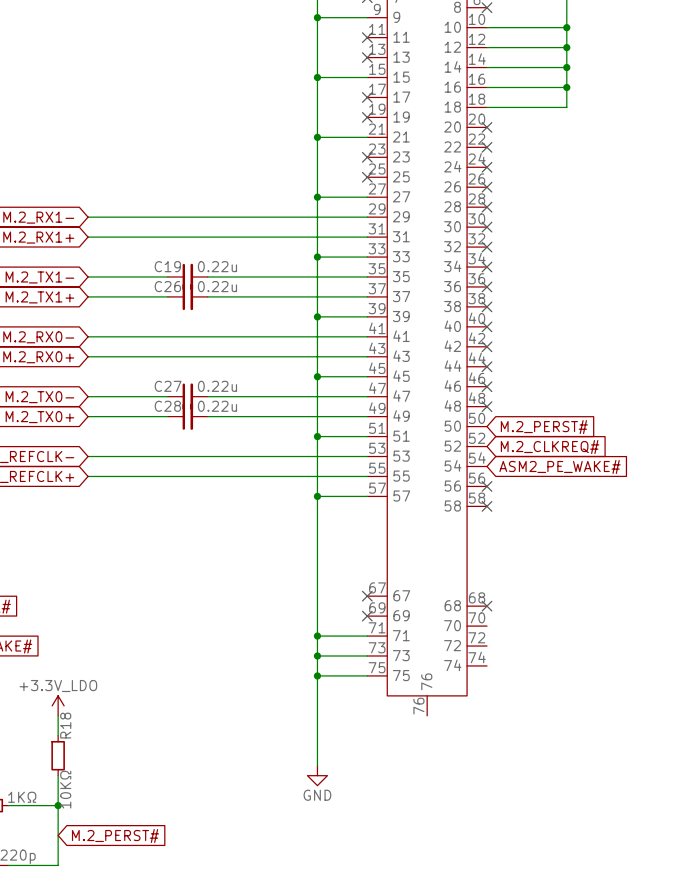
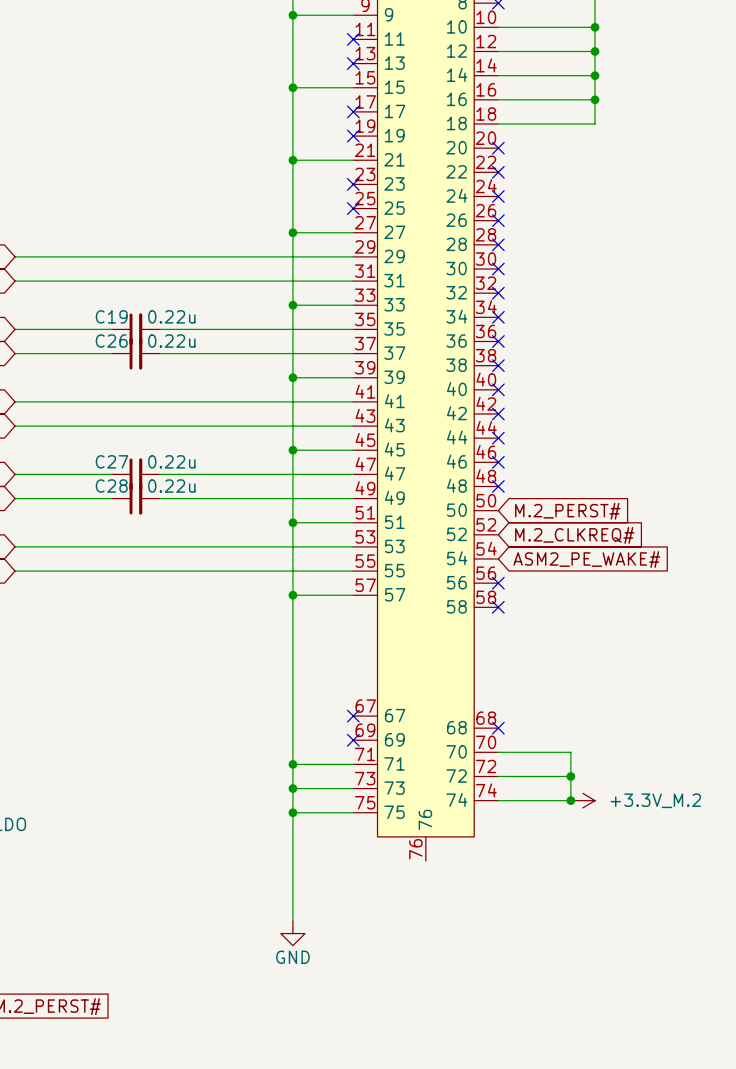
wire: none -> (498, 752) (570, 752) (570, 800) (498, 800)
wire: none -> (498, 776) (570, 776)
junction: none -> (570, 776)
junction: none -> (570, 800)
power symbol: none -> +3.3V_M.2 (582, 800)

